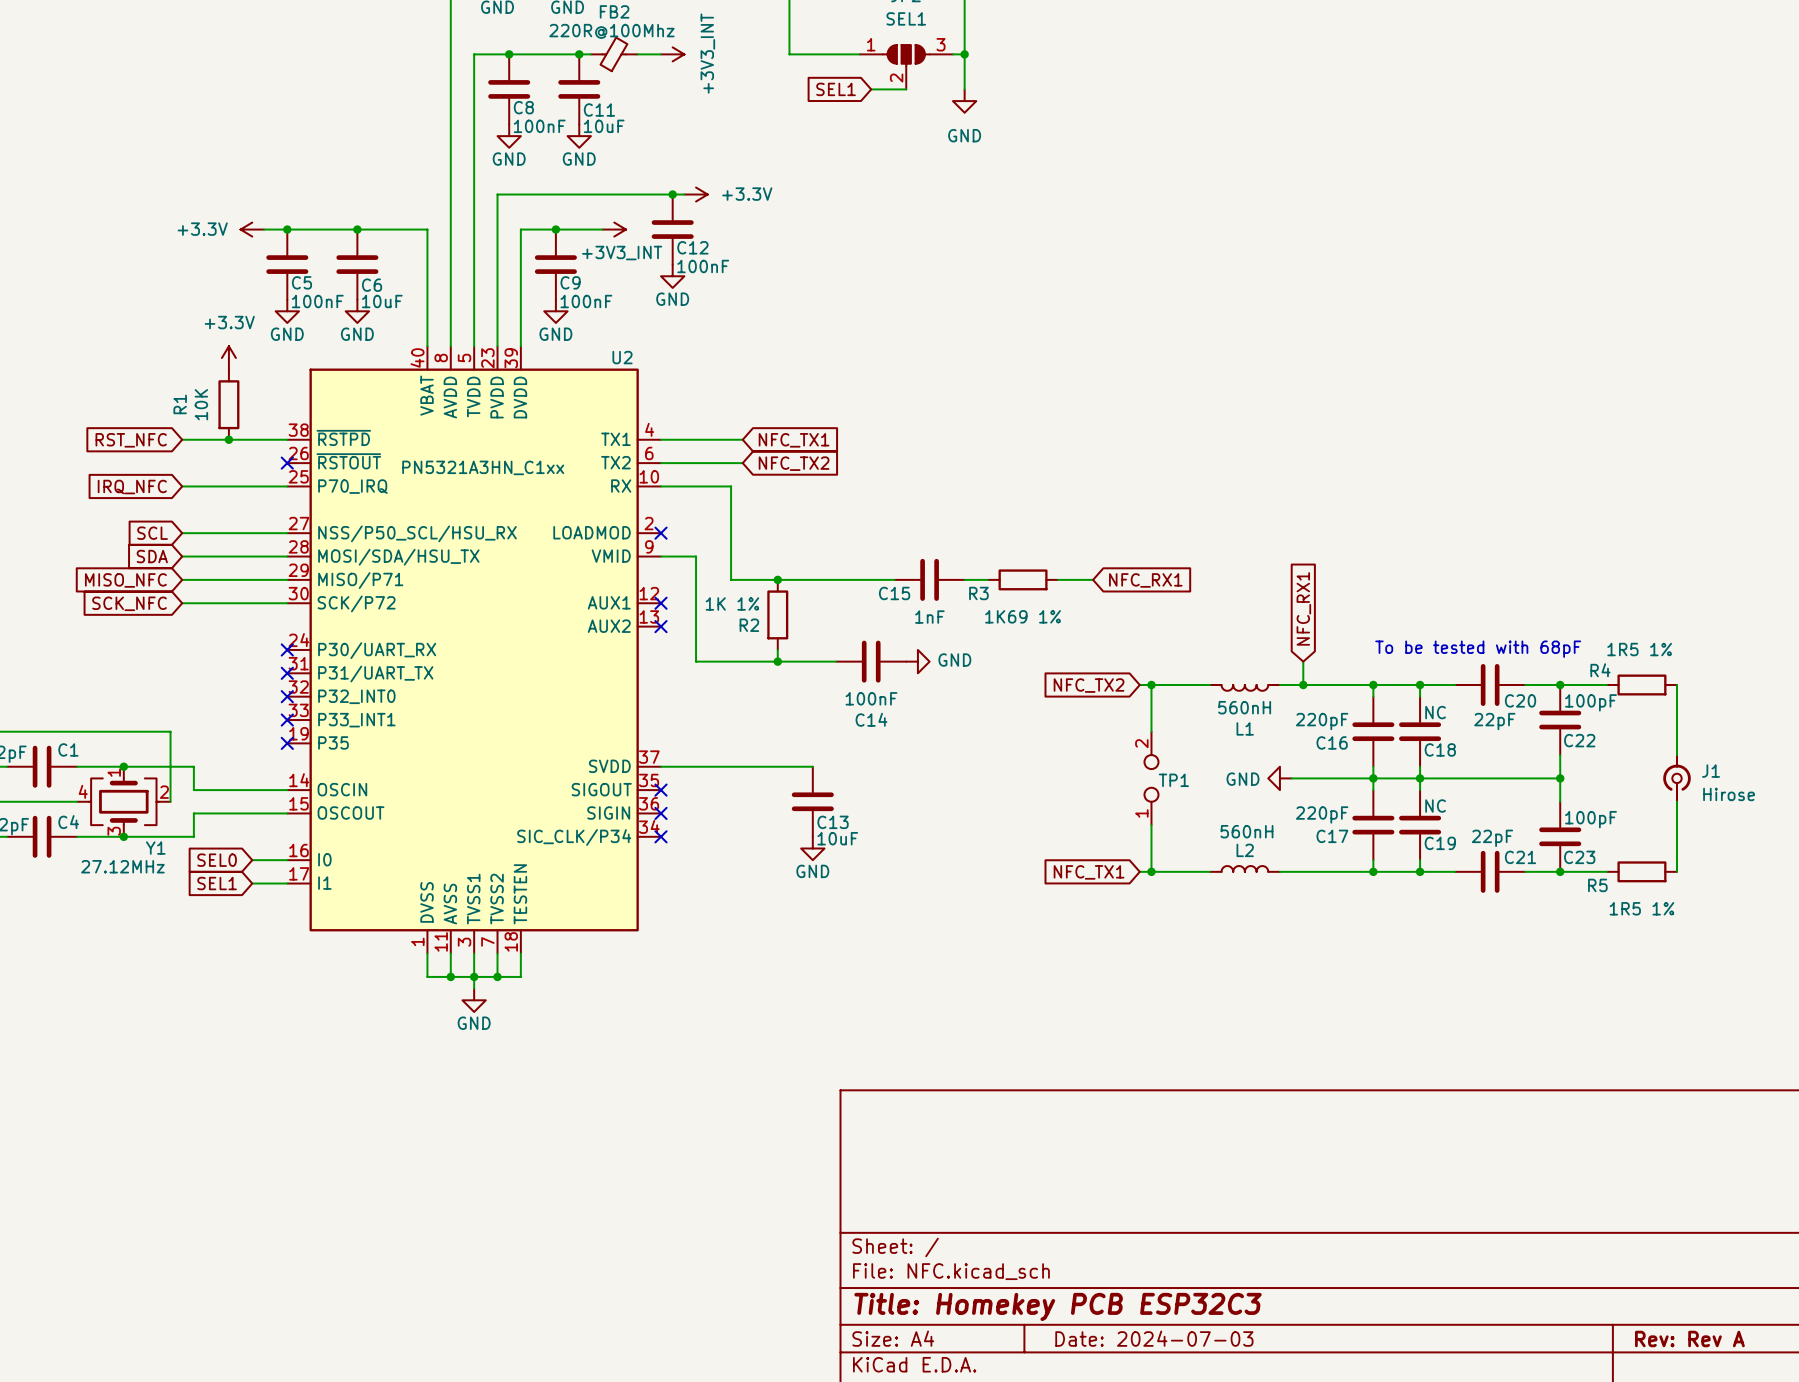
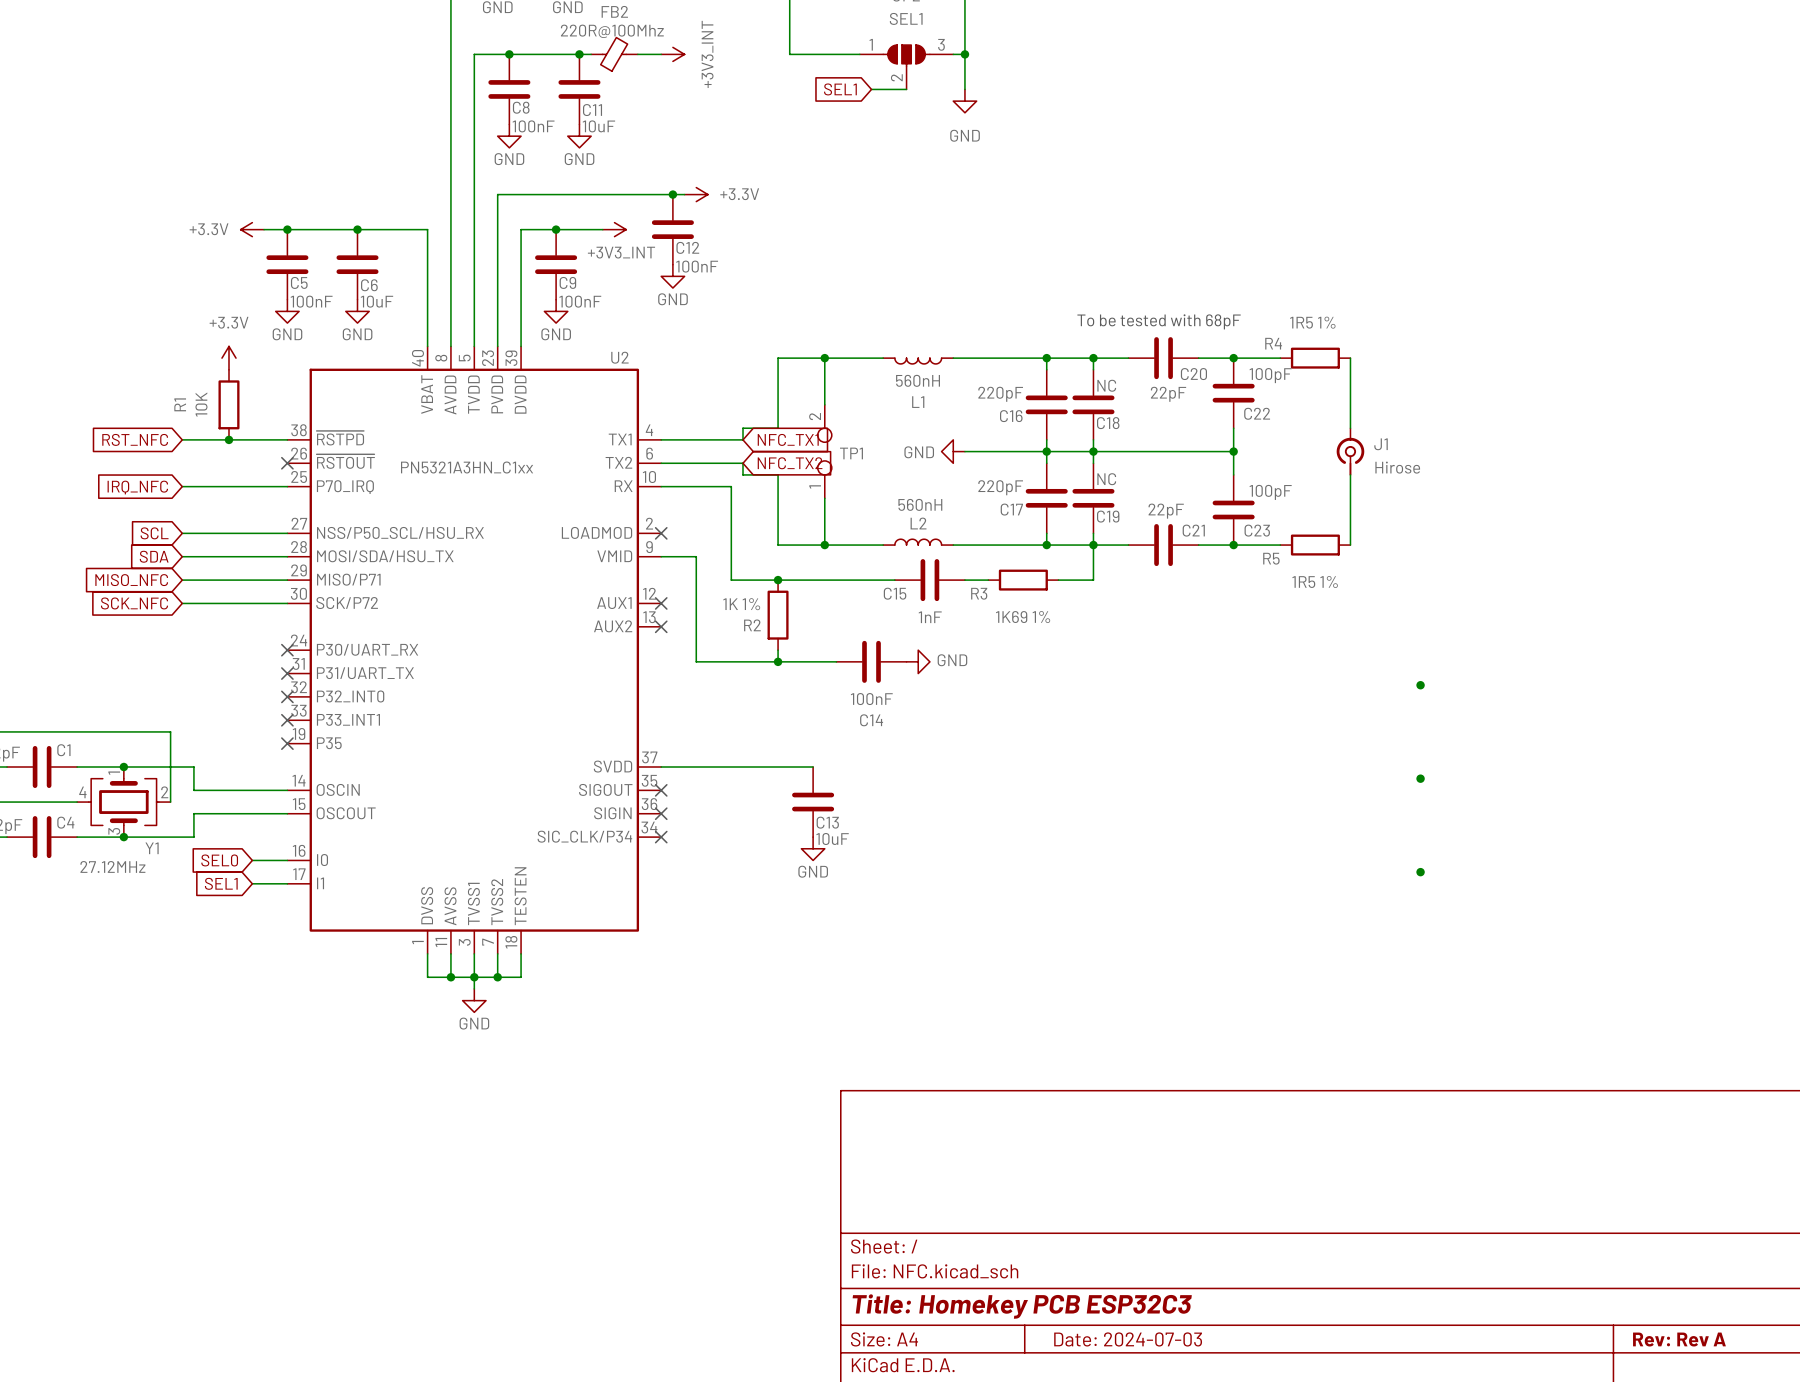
text: none -> To be tested with 68pF (1159, 321)
wire: none -> (824, 358) (824, 404)
junction: none -> (824, 358)
wire: none -> (883, 358) (778, 358) (778, 428) (743, 428) (743, 439)
wire: none -> (953, 358) (1128, 358)
wire: none -> (1046, 358) (1046, 369)
junction: none -> (1046, 358)
wire: none -> (1093, 358) (1093, 369)
junction: none -> (1093, 358)
wire: none -> (1198, 358) (1280, 358)
junction: none -> (1233, 358)
wire: none -> (1350, 358) (1350, 428)
wire: none -> (1233, 428) (1233, 474)
wire: none -> (1046, 439) (1046, 463)
wire: none -> (1093, 439) (1093, 463)
power symbol: none -> GND (953, 451)
wire: none -> (964, 451) (1233, 451)
junction: none -> (1046, 451)
junction: none -> (1093, 451)
junction: none -> (1233, 451)
wire: none -> (743, 463) (743, 474) (778, 474) (778, 545) (883, 545)
wire: none -> (1350, 474) (1350, 545)
wire: none -> (824, 498) (824, 545)
wire: none -> (1046, 533) (1046, 545)
junction: none -> (824, 545)
wire: none -> (953, 545) (1128, 545)
junction: none -> (1046, 545)
junction: none -> (1093, 545)
wire: none -> (1198, 545) (1280, 545)
junction: none -> (1233, 545)
global label: NFC_RX1 (1145, 580) -> none
global label: NFC_RX1 (1303, 608) -> none
text: To be tested with 68pF (1478, 649) -> none
wire: (1303, 661) (1303, 684) -> none
wire: (1139, 684) (1209, 684) -> none
wire: (1151, 684) (1151, 731) -> (1093, 533) (1093, 580)
junction: (1151, 684) -> none
wire: (1279, 684) (1455, 684) -> none
junction: (1303, 684) -> none
wire: (1373, 684) (1373, 696) -> none
junction: (1373, 684) -> none
wire: (1420, 684) (1420, 696) -> none
C20 position: (1490, 684) -> (1163, 358)
wire: (1525, 684) (1606, 684) -> none
junction: (1560, 684) -> none
R4 position: (1641, 684) -> (1315, 358)
wire: (1676, 684) (1676, 755) -> none
global label: NFC_TX2 (1089, 685) -> none
L1 position: (1244, 687) -> (918, 361)
C22 position: (1560, 720) -> (1233, 393)
C16 position: (1373, 731) -> (1046, 404)
C18 position: (1420, 731) -> (1093, 404)
wire: (1560, 755) (1560, 801) -> none
wire: (1373, 766) (1373, 790) -> none
wire: (1420, 766) (1420, 790) -> none
TP1 position: (1151, 778) -> (824, 451)
power symbol: GND (1279, 778) -> none
wire: (1291, 778) (1560, 778) -> none
junction: (1373, 778) -> none
junction: (1560, 778) -> none
J1 position: (1676, 778) -> (1350, 451)
wire: (1676, 801) (1676, 871) -> none
wire: (1151, 825) (1151, 871) -> none
C17 position: (1373, 825) -> (1046, 498)
C19 position: (1420, 825) -> (1093, 498)
C23 position: (1560, 836) -> (1233, 509)
wire: (1373, 860) (1373, 871) -> none
wire: (1420, 860) (1420, 871) -> none
L2 position: (1244, 868) -> (918, 542)
wire: (1139, 871) (1209, 871) -> none
junction: (1151, 871) -> none
wire: (1279, 871) (1455, 871) -> none
junction: (1373, 871) -> none
C21 position: (1490, 871) -> (1163, 545)
wire: (1525, 871) (1606, 871) -> none
junction: (1560, 871) -> none
R5 position: (1641, 871) -> (1315, 545)
global label: NFC_TX1 (1089, 872) -> none

